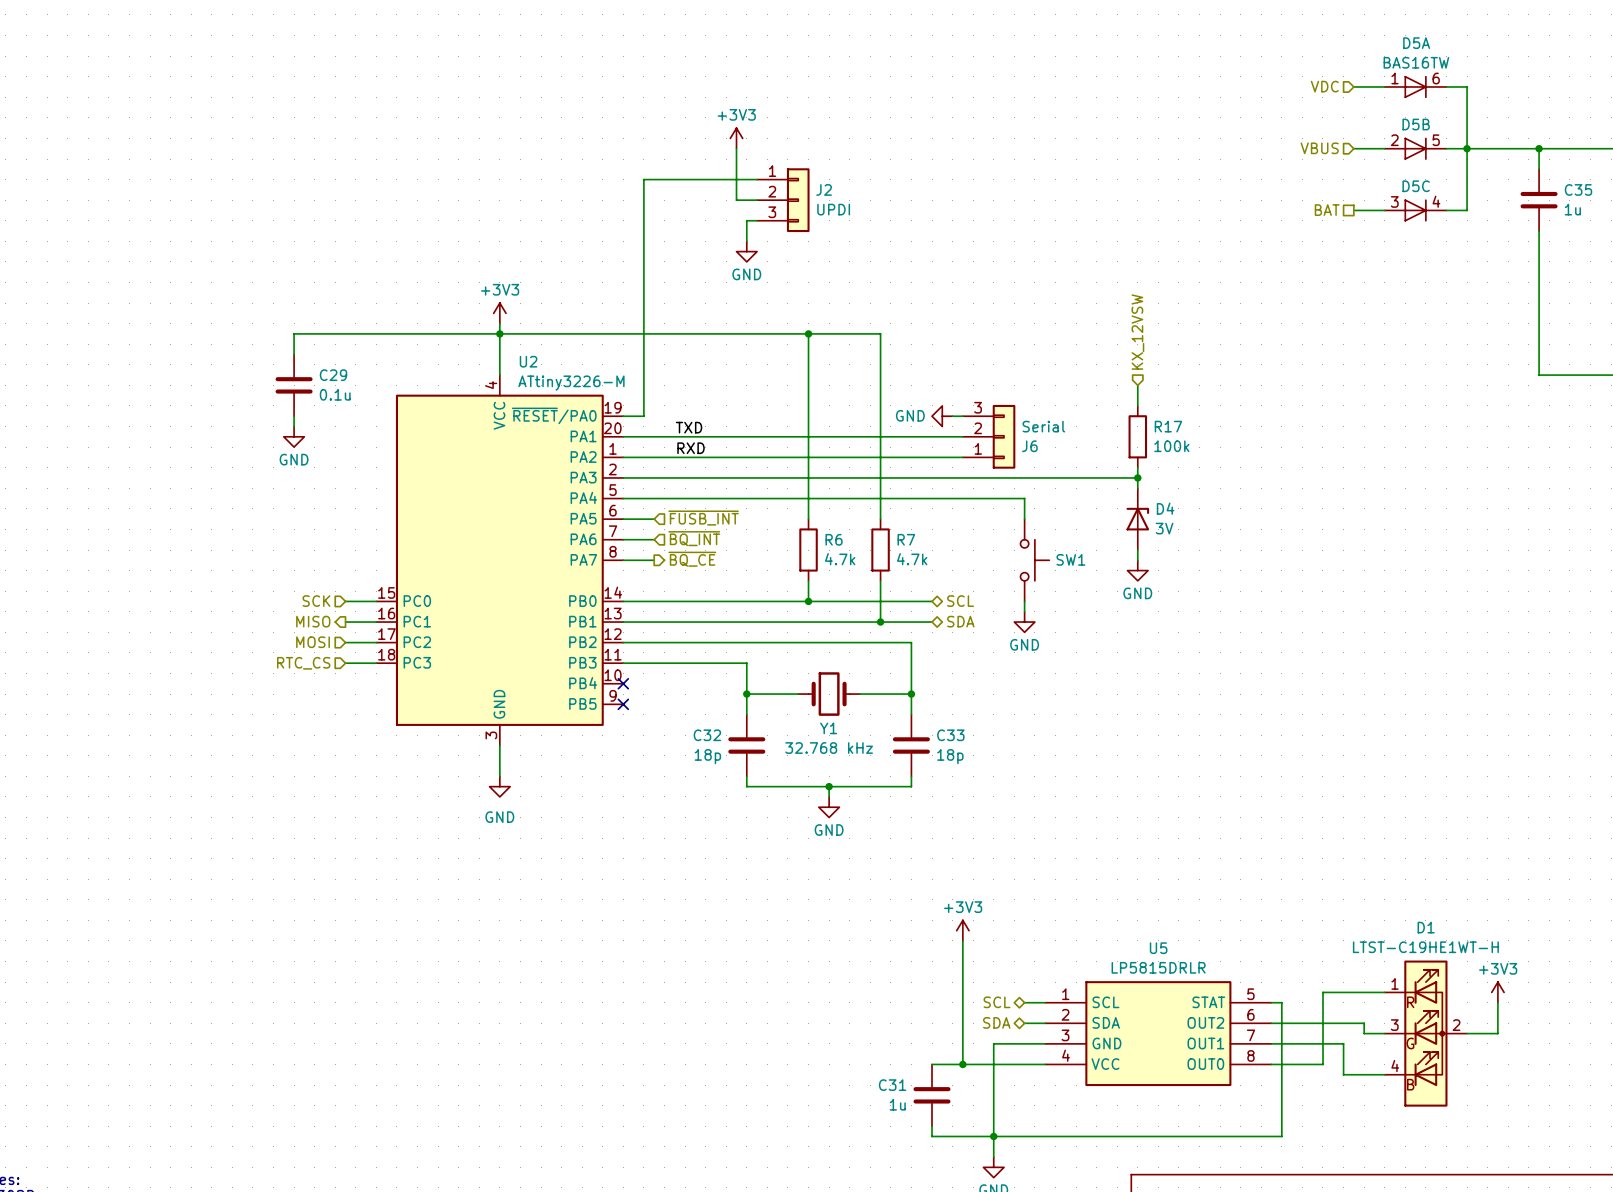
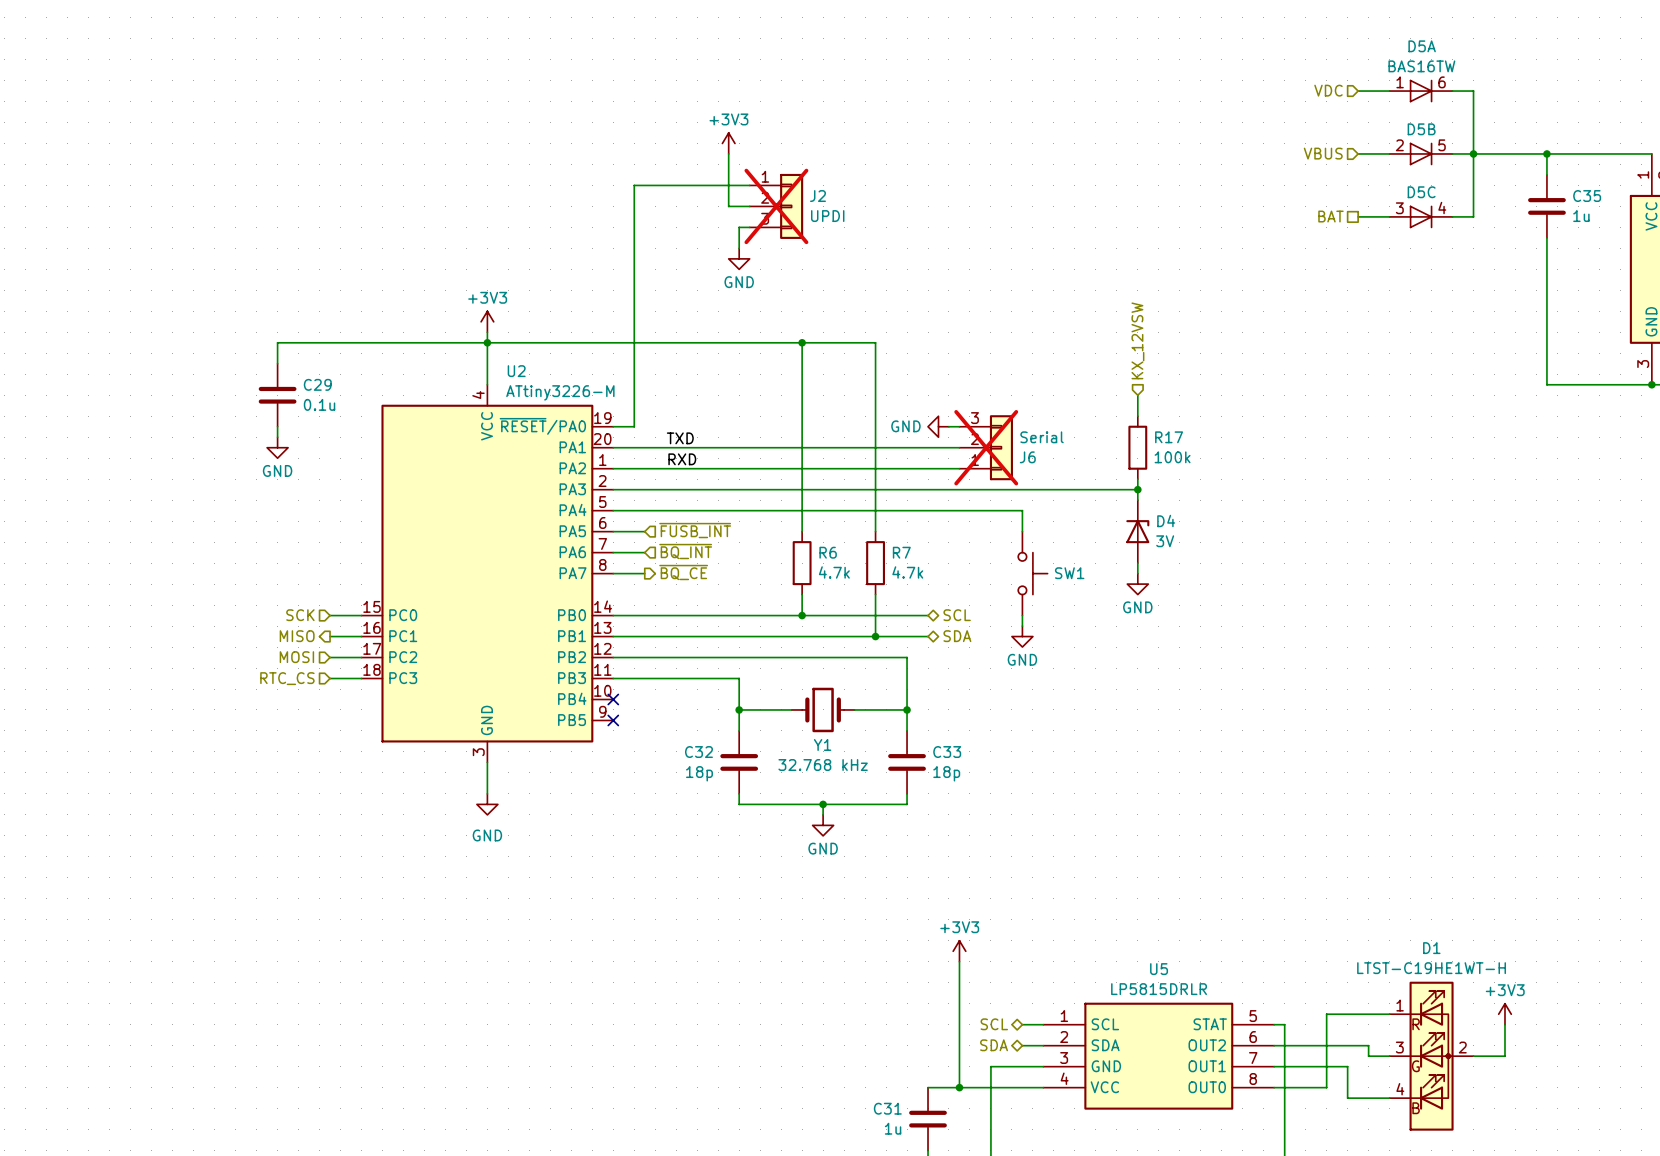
J2 do-not-place cross: none -> (776, 206)
J6 do-not-place cross: none -> (986, 447)

